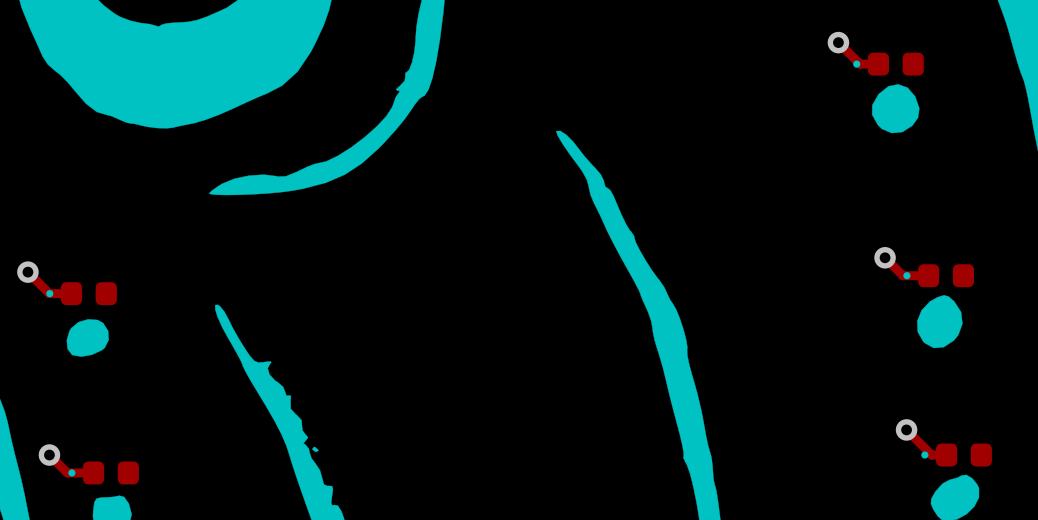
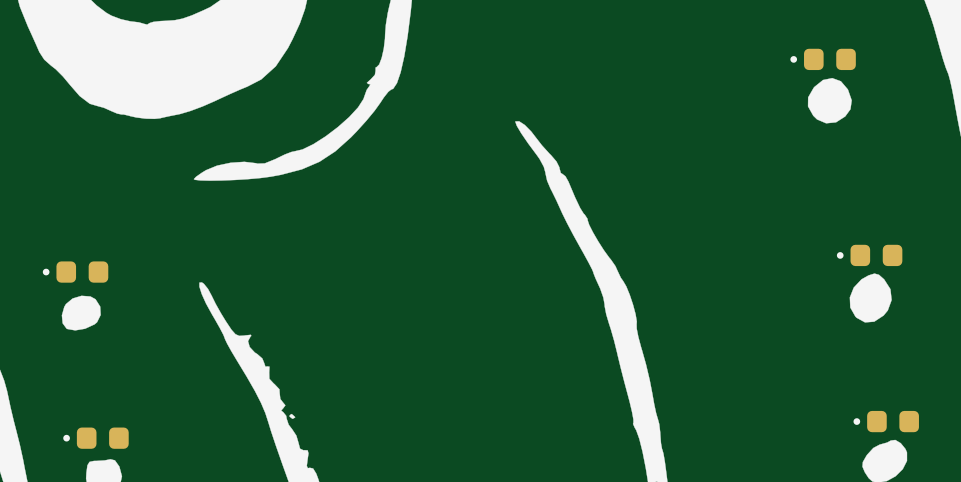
track: (838, 42) (859, 64) (878, 64) -> none
via: (838, 42) -> none
track: (885, 257) (902, 275) (928, 275) -> none
via: (885, 257) -> none
track: (27, 272) (49, 293) (71, 293) -> none
via: (27, 272) -> none
track: (906, 429) (931, 455) (946, 455) -> none
via: (906, 429) -> none
track: (49, 455) (67, 472) (93, 472) -> none
via: (49, 455) -> none

